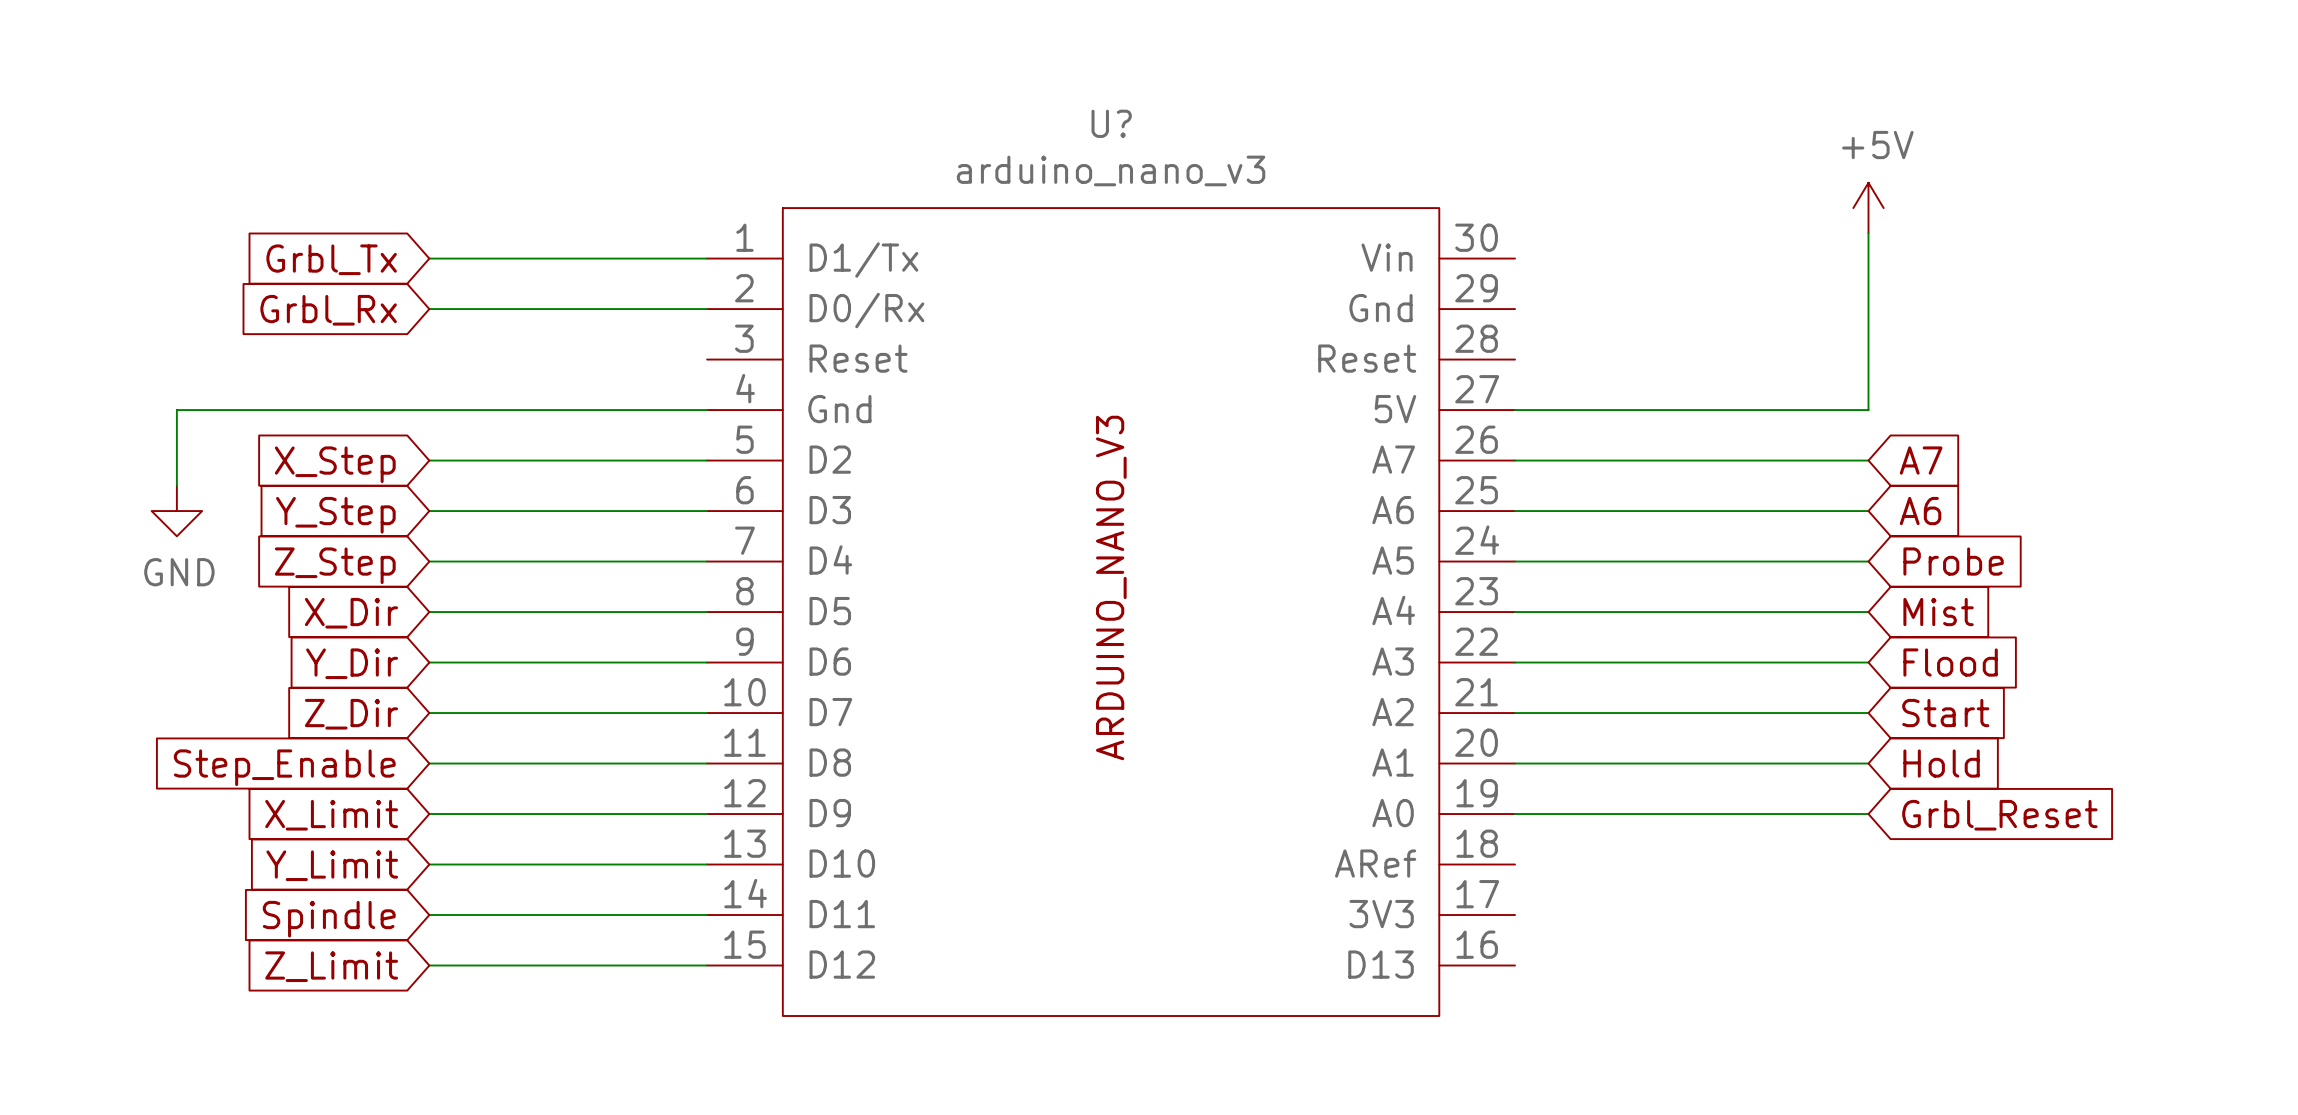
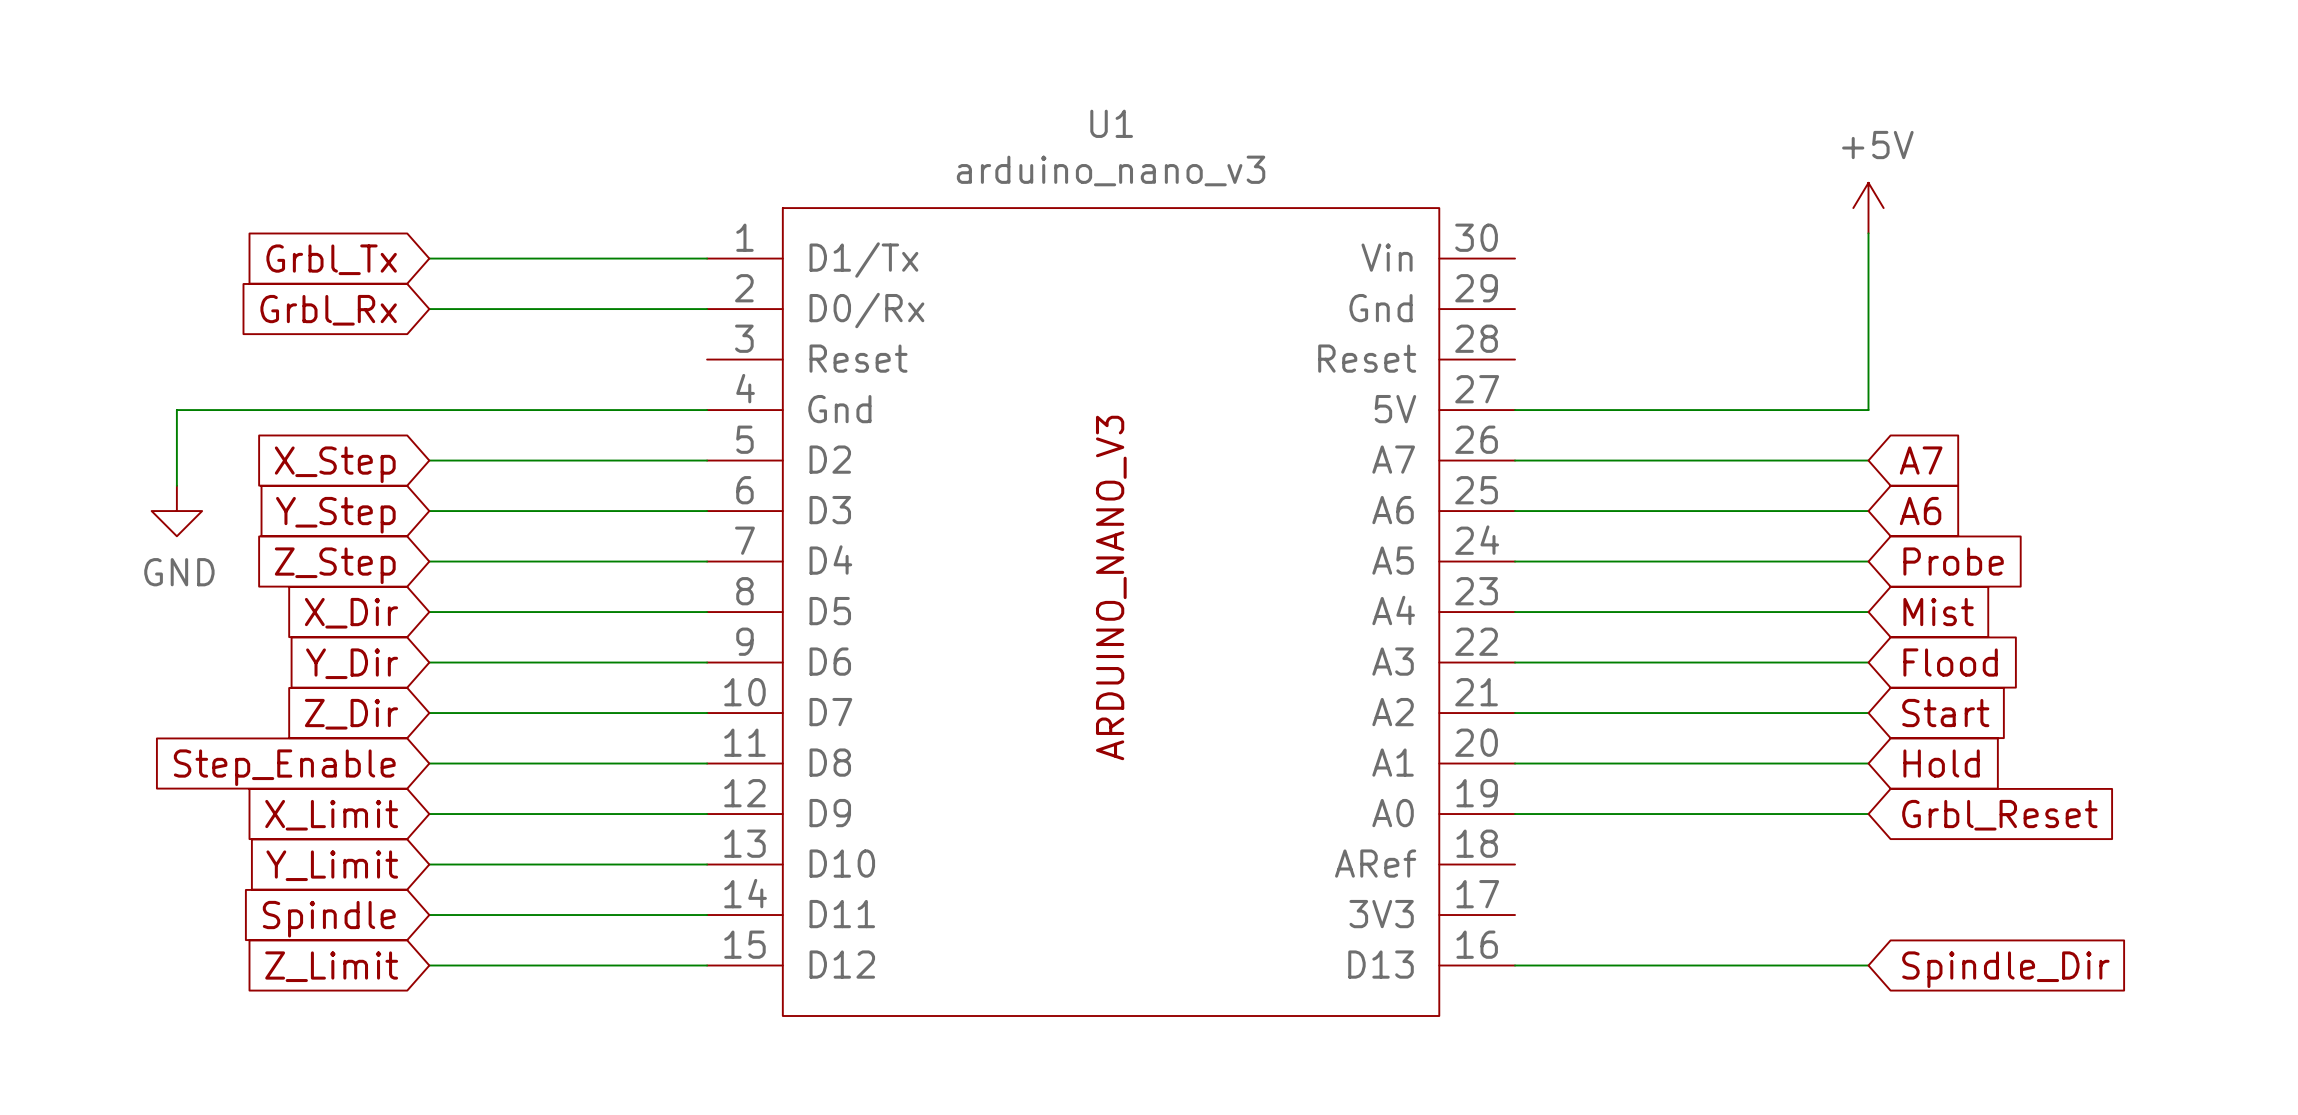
U? name: U? (1111, 123) -> U1 (1111, 123)
wire: none -> (1515, 965) (1868, 965)
global label: none -> Spindle_Dir (2005, 969)

